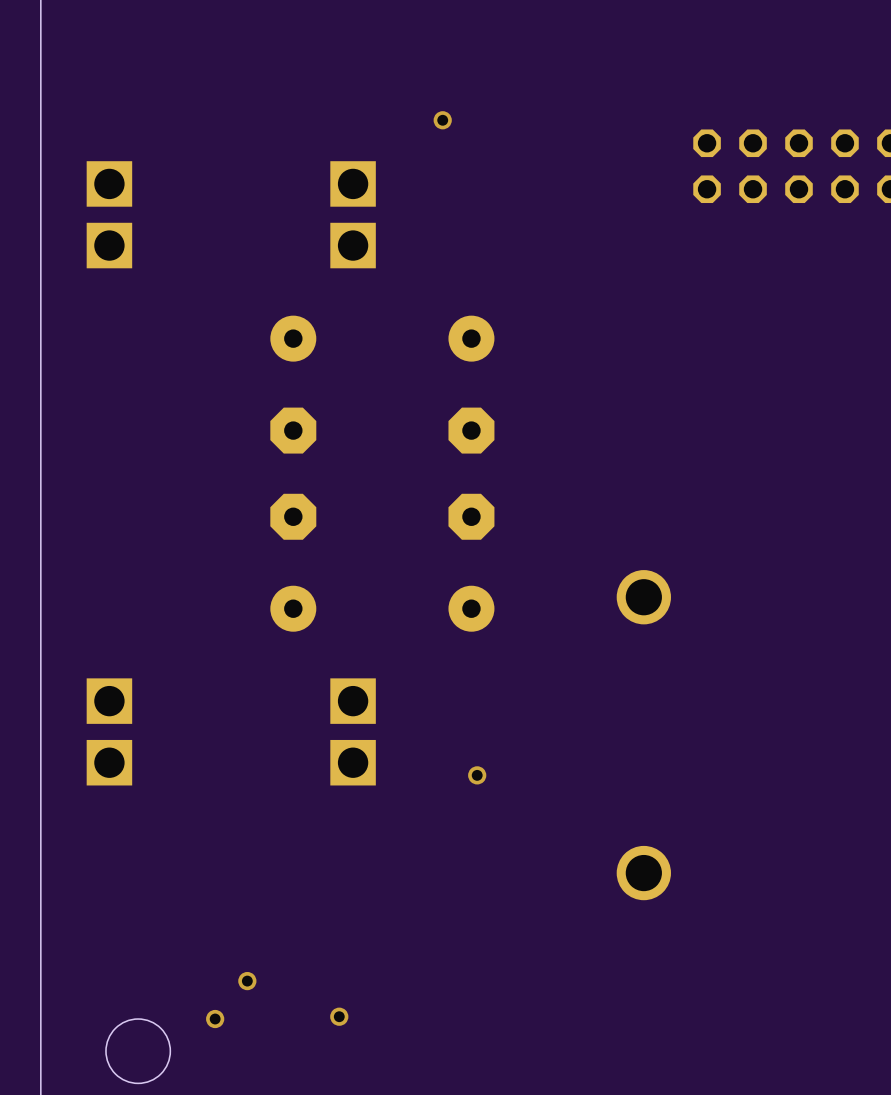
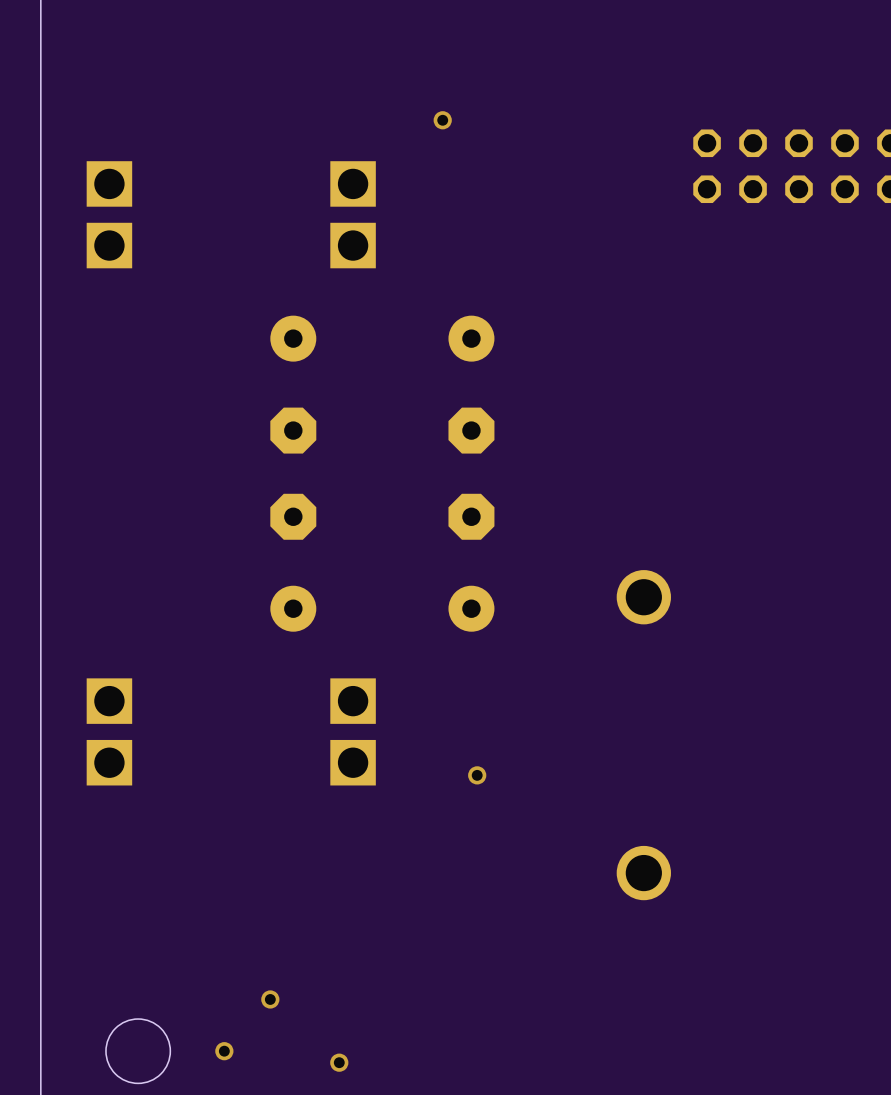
via: (247, 981) -> none
via: none -> (270, 999)
via: (339, 1016) -> none
via: (215, 1019) -> none
via: none -> (224, 1051)
via: none -> (339, 1062)

